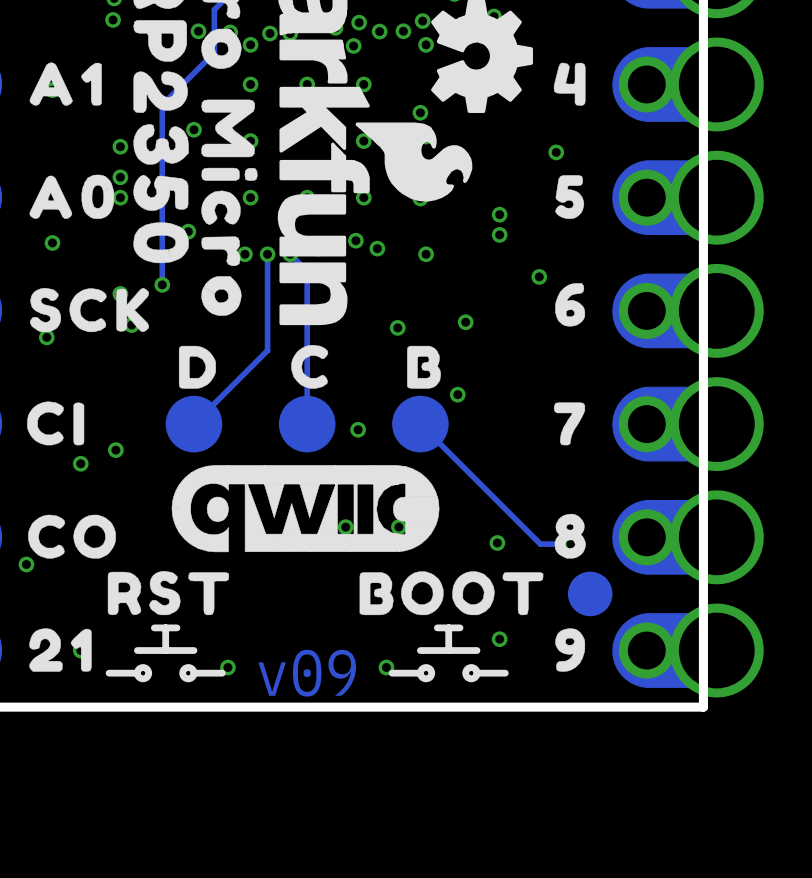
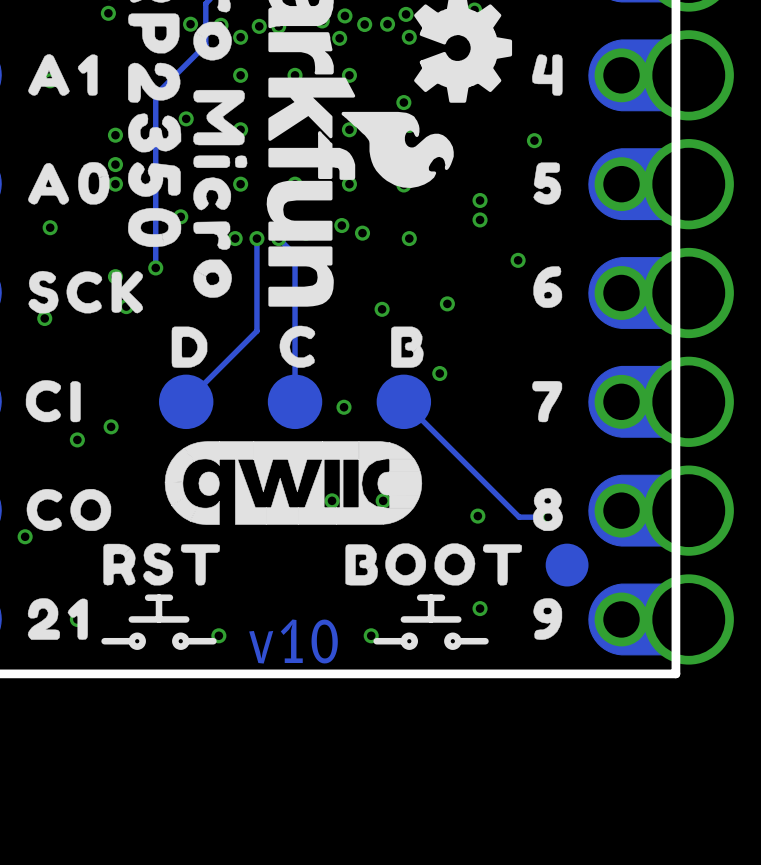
text: v09 (307, 673) -> v10 (293, 641)

